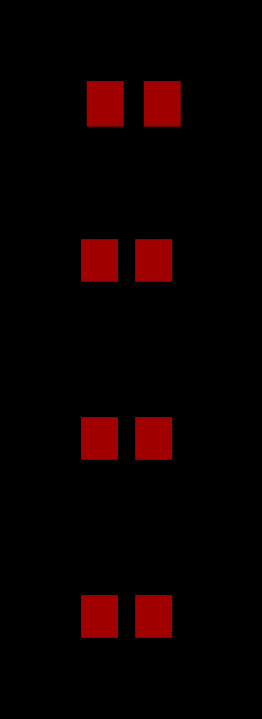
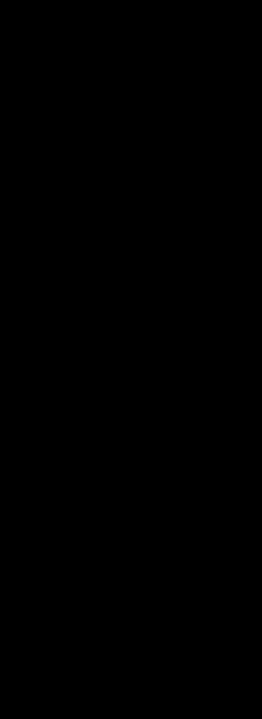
part: (133, 103) -> none
part: (126, 260) -> none
part: (126, 438) -> none
part: (126, 616) -> none

